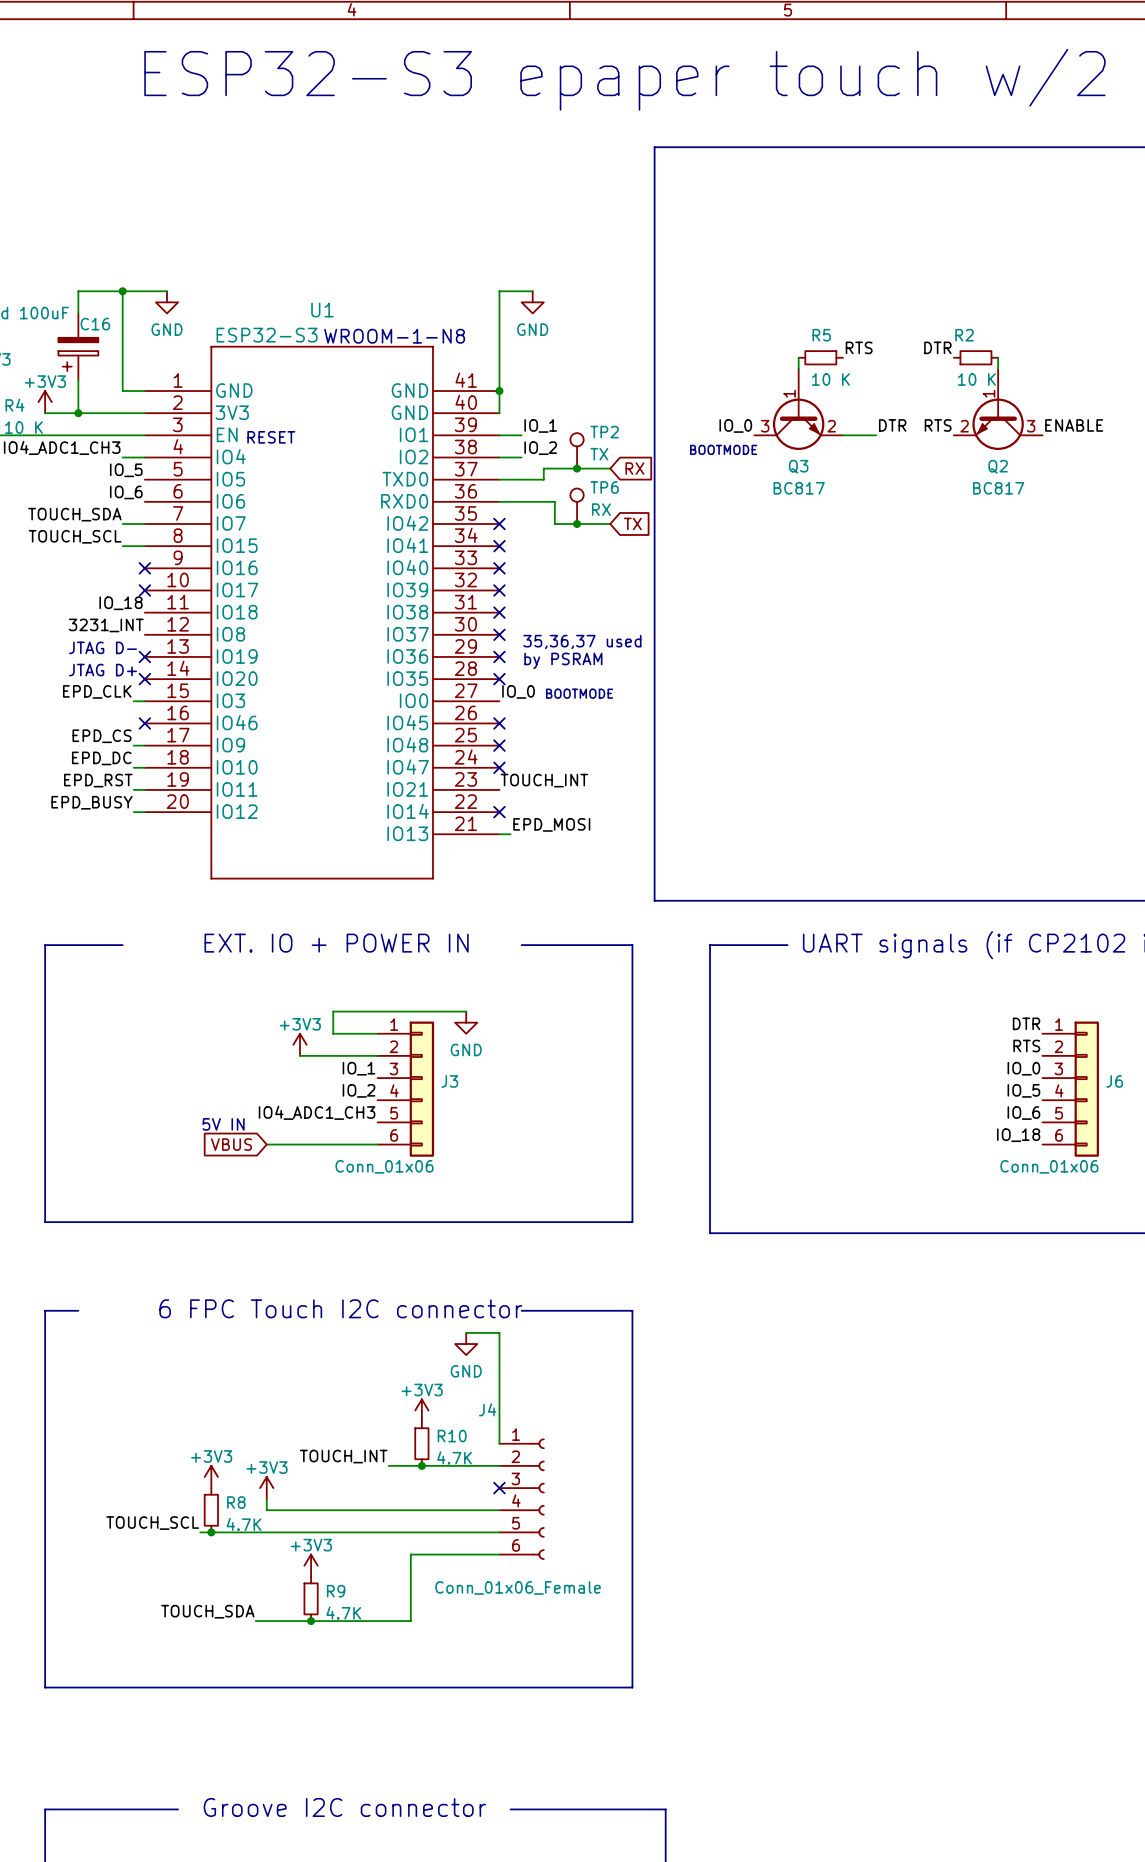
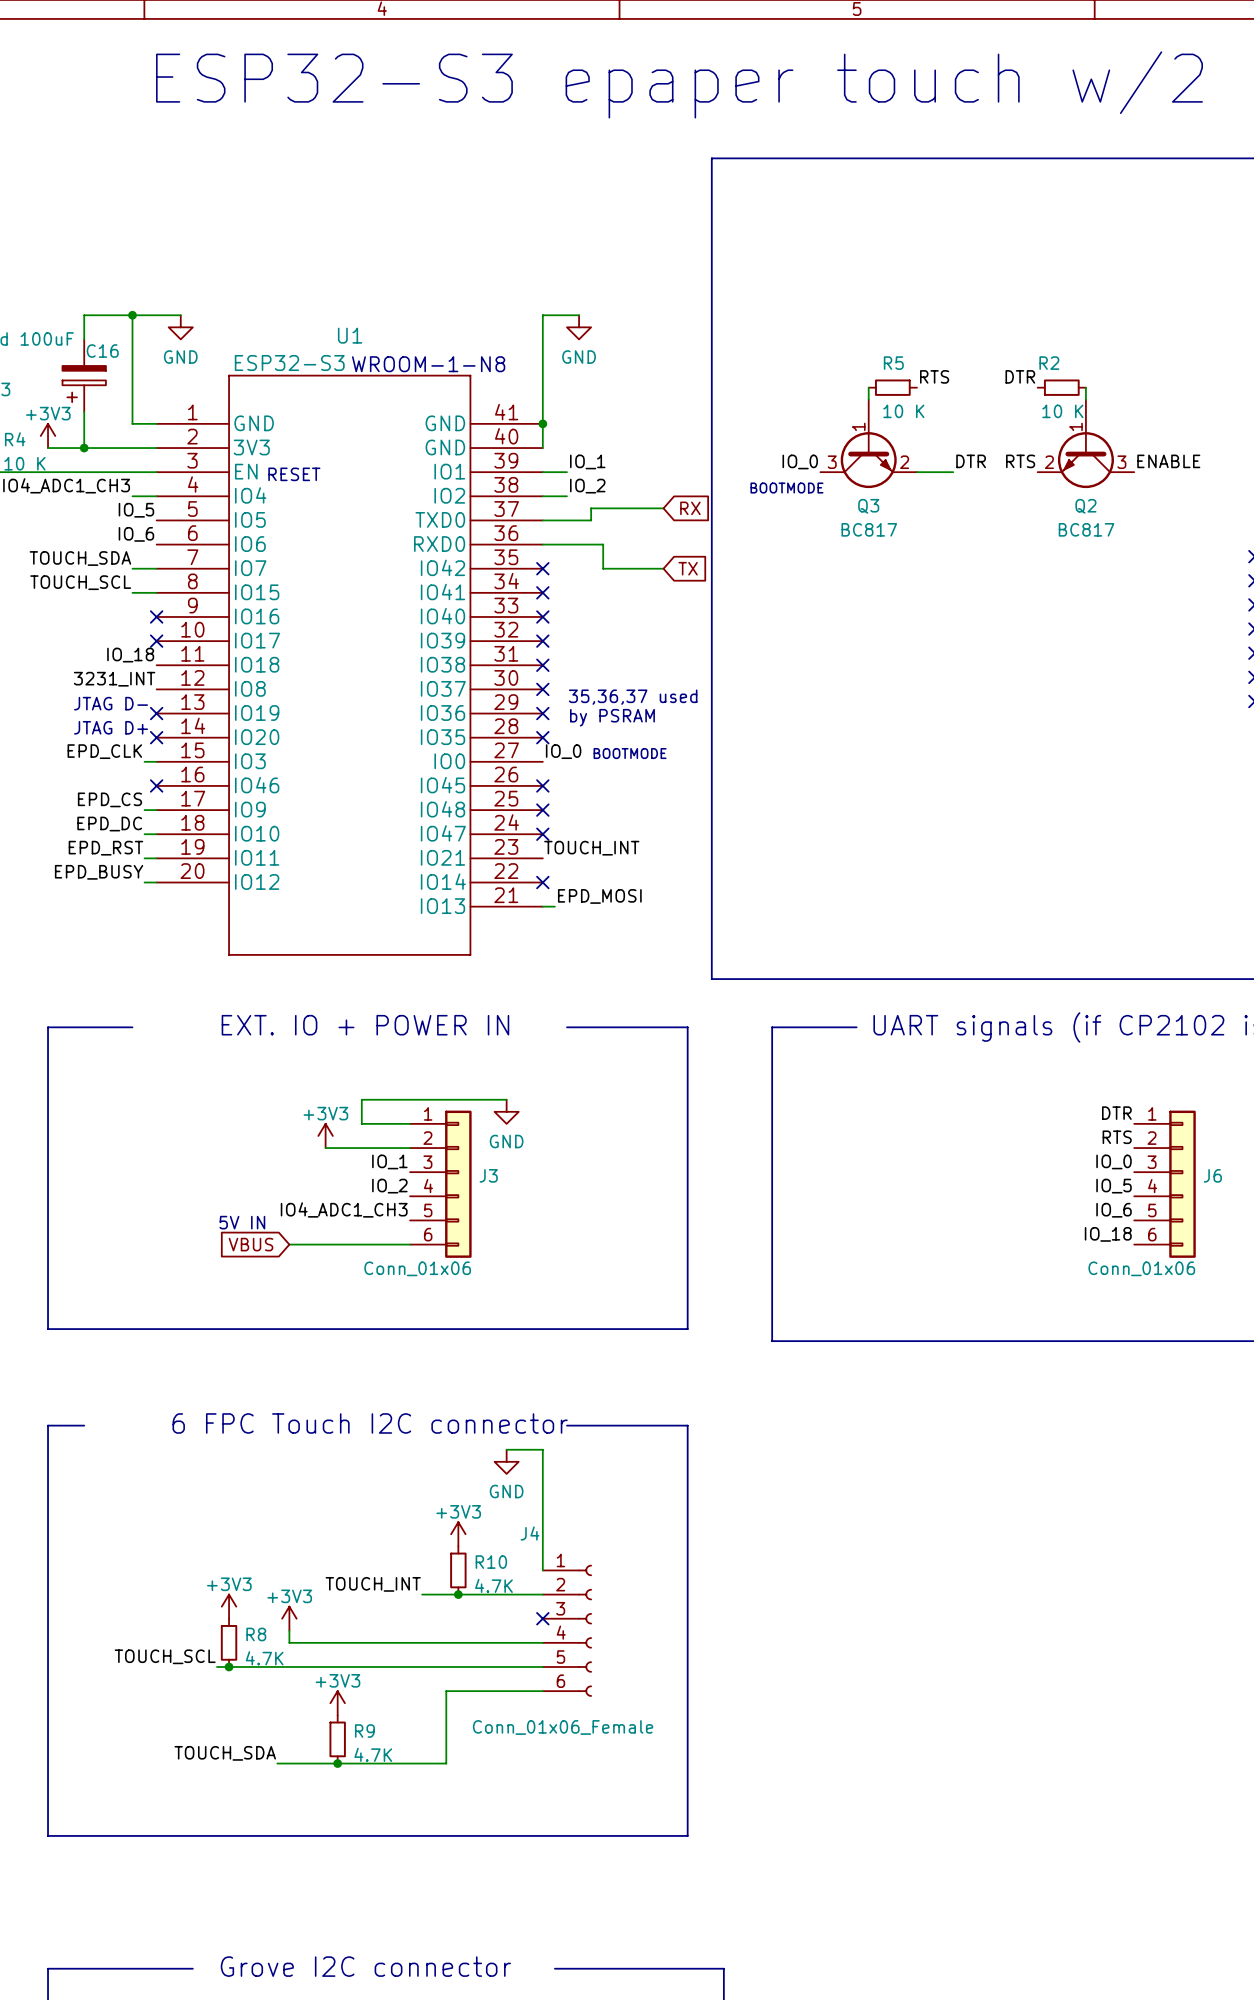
TP2: TX (577, 450) -> none
junction: (577, 468) -> none
TP6: RX (577, 506) -> none
junction: (577, 523) -> none
text: Groove I2C connector (344, 1807) -> Grove I2C connector (365, 1966)

